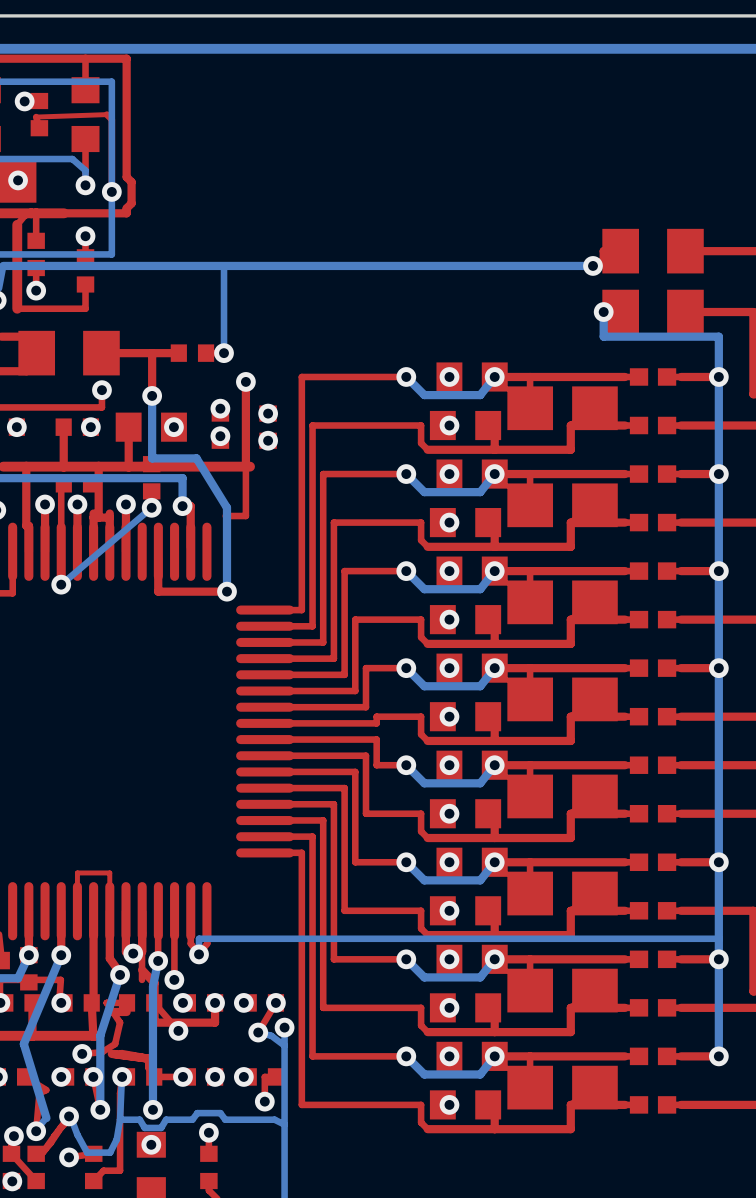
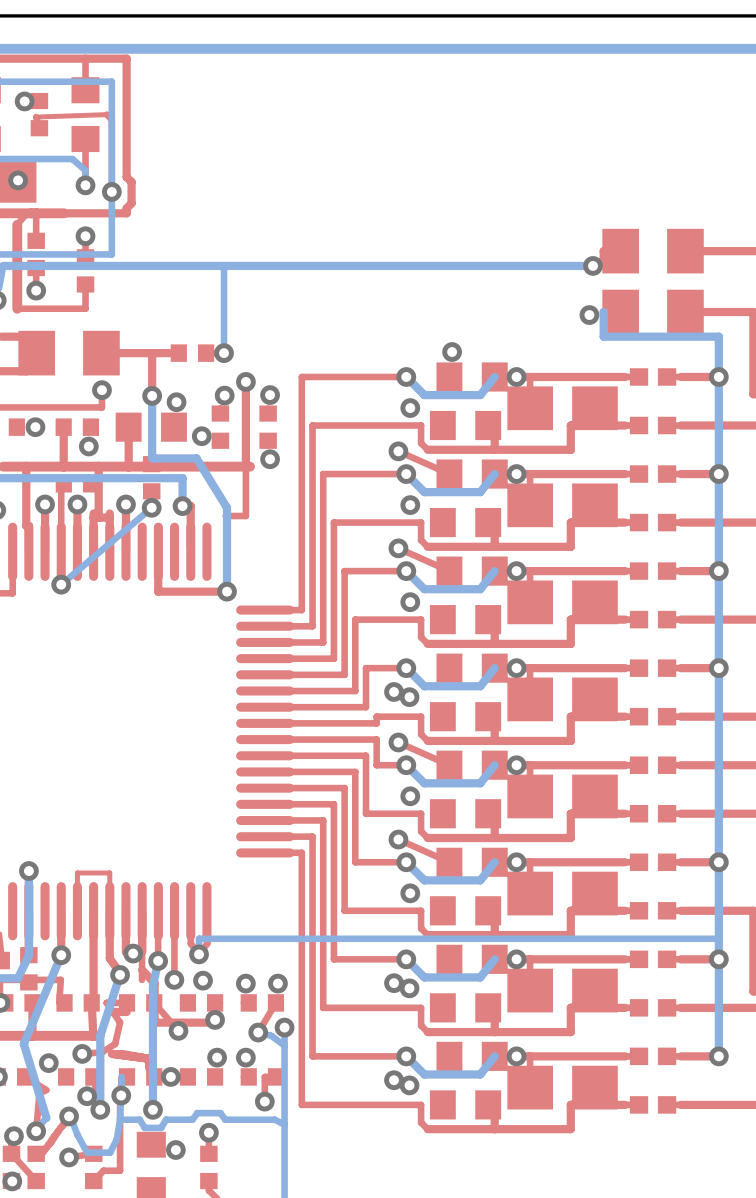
via position: (603, 312) -> (589, 315)
via: none -> (452, 352)
via: (449, 376) -> none
via position: (494, 376) -> (516, 376)
via: none -> (176, 402)
via position: (220, 408) -> (224, 395)
via: none -> (410, 408)
via position: (268, 413) -> (270, 395)
via: (449, 425) -> none
via position: (16, 427) -> (35, 427)
via position: (90, 427) -> (88, 446)
via: (173, 427) -> none
via position: (220, 436) -> (201, 436)
via position: (268, 440) -> (270, 459)
top track: none -> (398, 451) (449, 474)
via: none -> (398, 451)
via: (449, 474) -> none
via position: (494, 474) -> (516, 474)
via: none -> (410, 505)
via: (449, 522) -> none
top track: none -> (398, 548) (449, 571)
via: none -> (398, 548)
via: (449, 571) -> none
via position: (494, 571) -> (516, 571)
via: none -> (410, 602)
via: (449, 619) -> none
via: (449, 668) -> none
via position: (494, 668) -> (516, 668)
via: none -> (394, 691)
via: none -> (409, 697)
via: (449, 716) -> none
top track: none -> (398, 742) (449, 765)
via: none -> (398, 742)
via: (449, 765) -> none
via position: (494, 765) -> (516, 765)
via: none -> (410, 796)
via: (449, 813) -> none
top track: none -> (398, 839) (449, 862)
via: none -> (398, 839)
via: (449, 862) -> none
via position: (494, 862) -> (516, 862)
bottom track: none -> (28, 871) (28, 955)
via: none -> (28, 871)
via: none -> (410, 893)
via: (449, 910) -> none
via: (28, 955) -> none
via: (449, 959) -> none
via position: (494, 959) -> (516, 959)
via: none -> (203, 980)
via: none -> (394, 983)
via: none -> (409, 988)
via: (61, 1002) -> none
via: (182, 1002) -> none
via position: (215, 1002) -> (215, 1019)
via position: (243, 1002) -> (245, 983)
via position: (275, 1002) -> (277, 983)
via: (449, 1007) -> none
via: (449, 1056) -> none
via position: (494, 1056) -> (516, 1056)
via position: (61, 1076) -> (48, 1063)
via position: (93, 1076) -> (87, 1096)
via position: (122, 1076) -> (121, 1095)
via position: (182, 1076) -> (170, 1076)
via position: (215, 1076) -> (217, 1057)
via position: (243, 1076) -> (245, 1057)
via: none -> (394, 1080)
via: none -> (409, 1085)
via: (449, 1104) -> none
via position: (151, 1144) -> (175, 1150)

